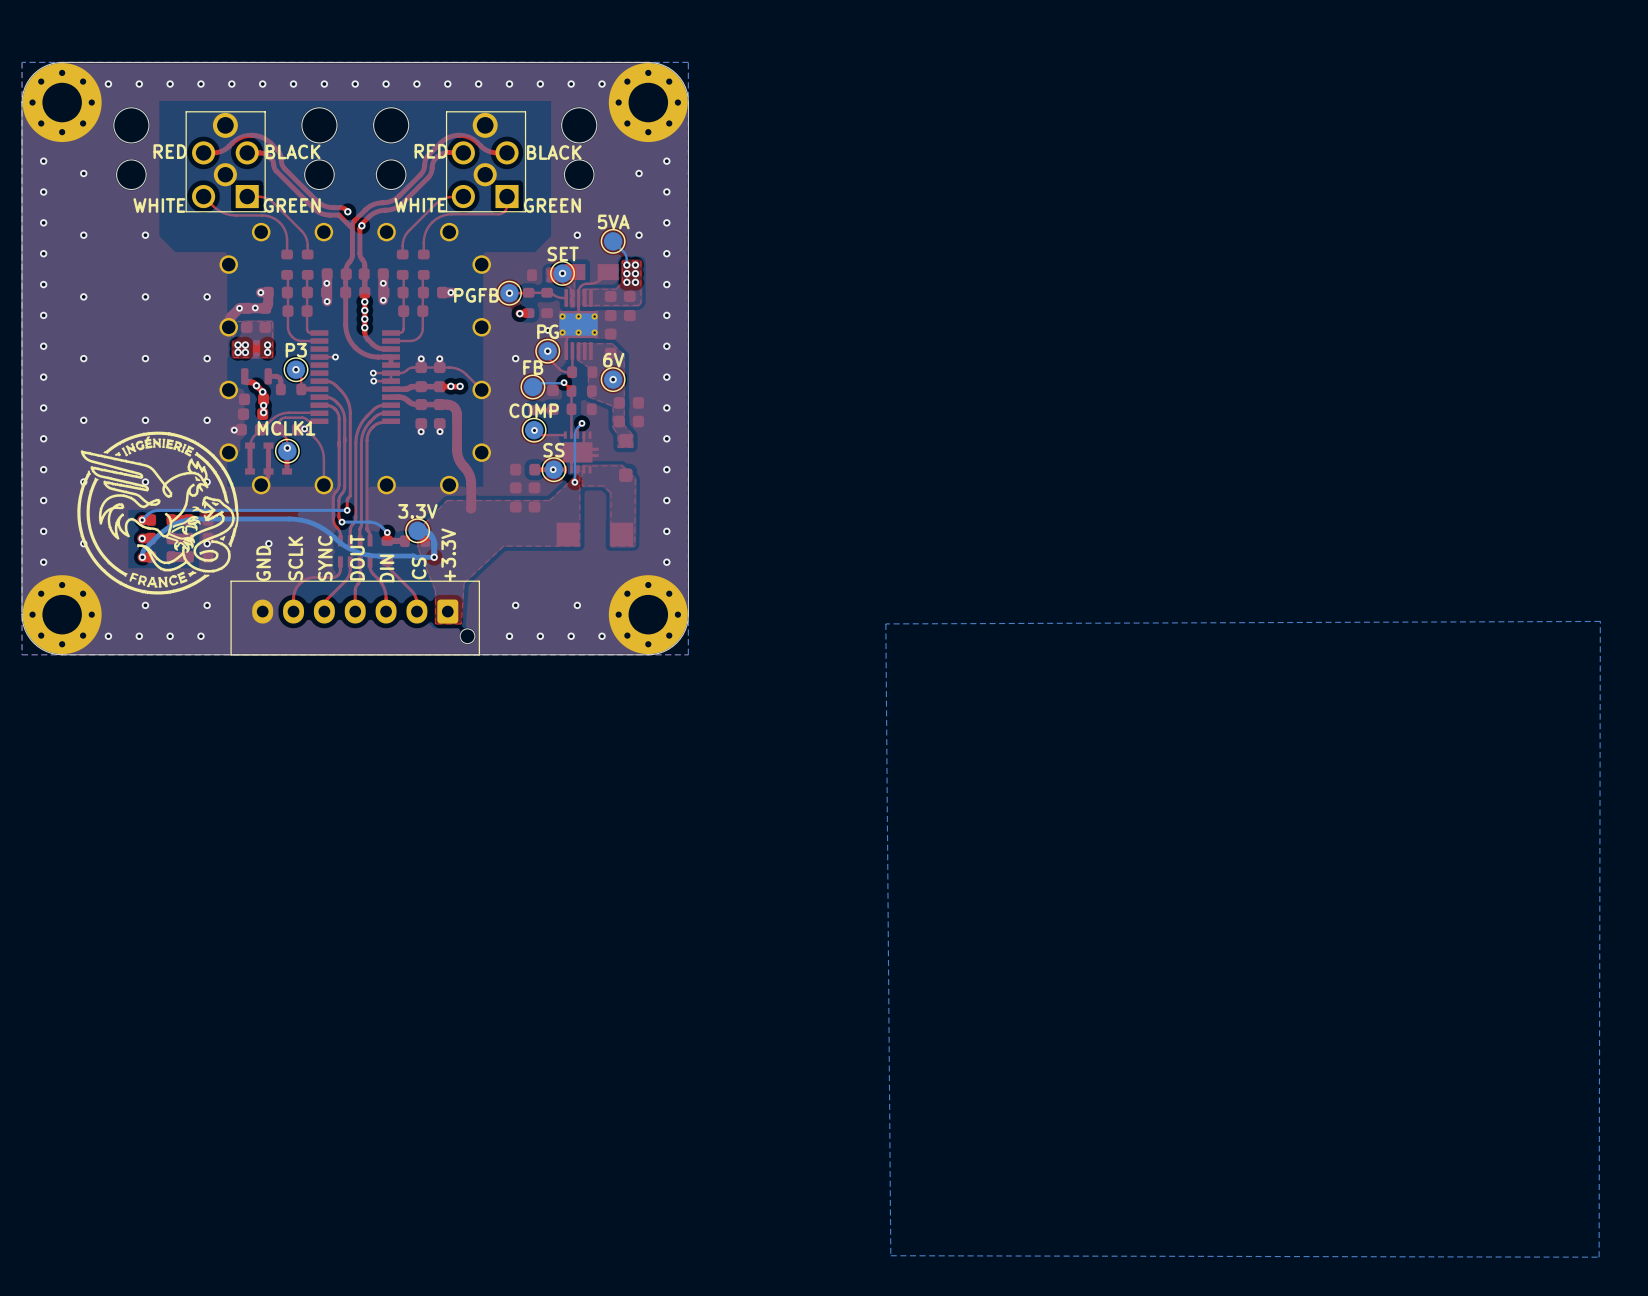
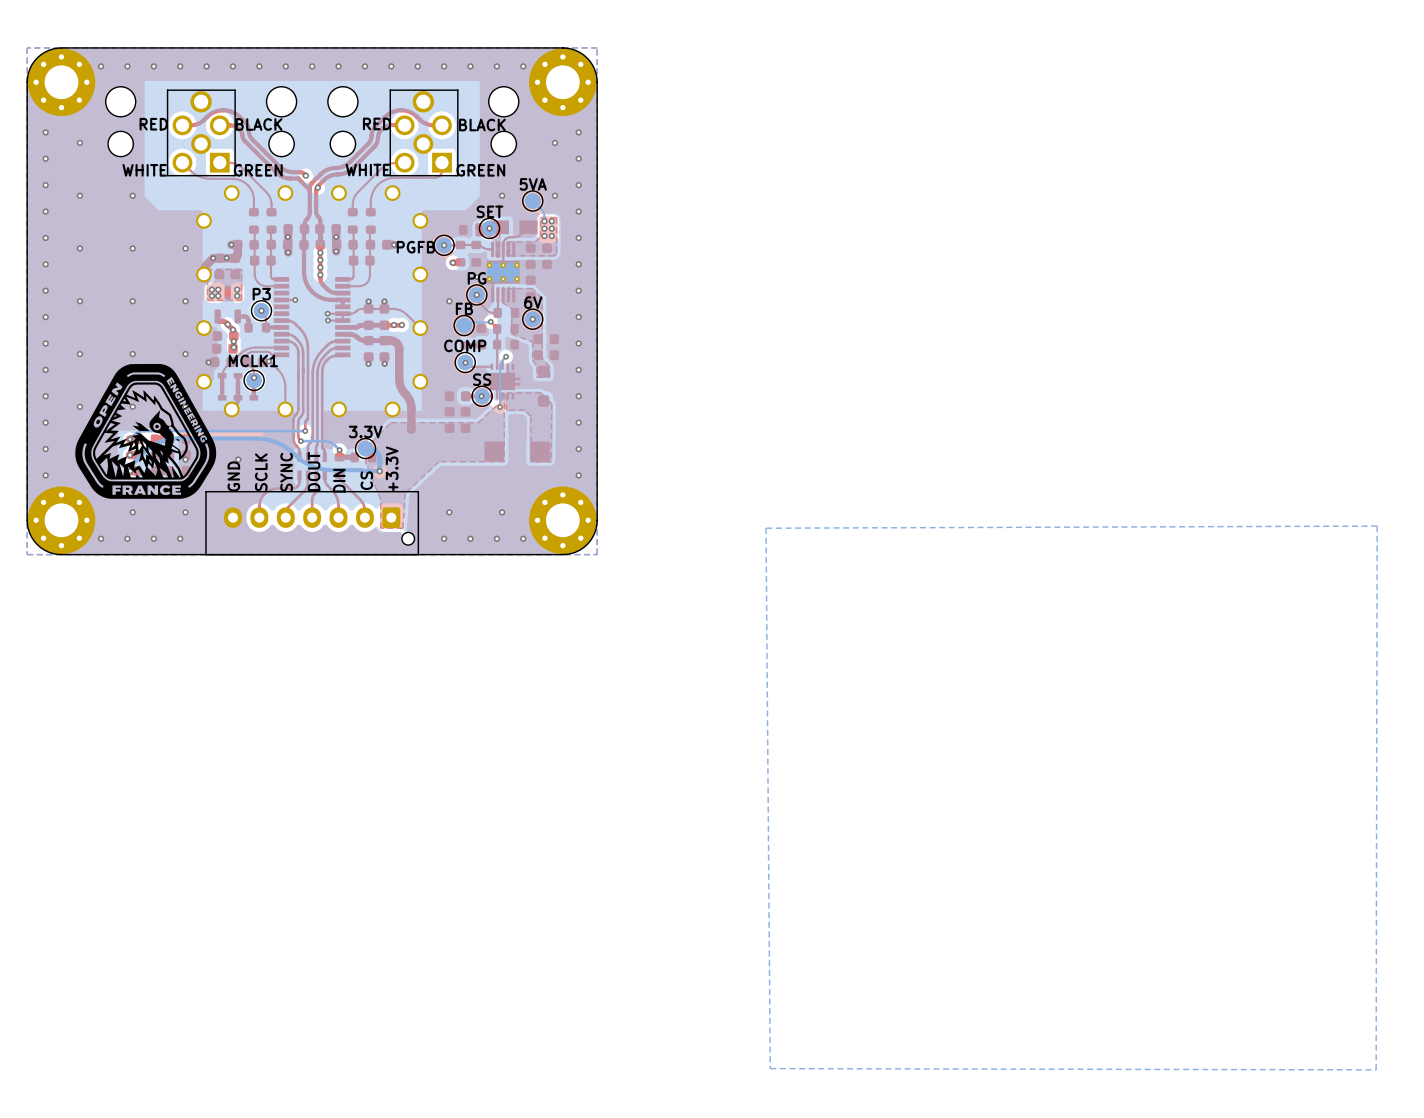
drawing shape: [77, 431, 239, 595] -> [75, 364, 217, 499]

